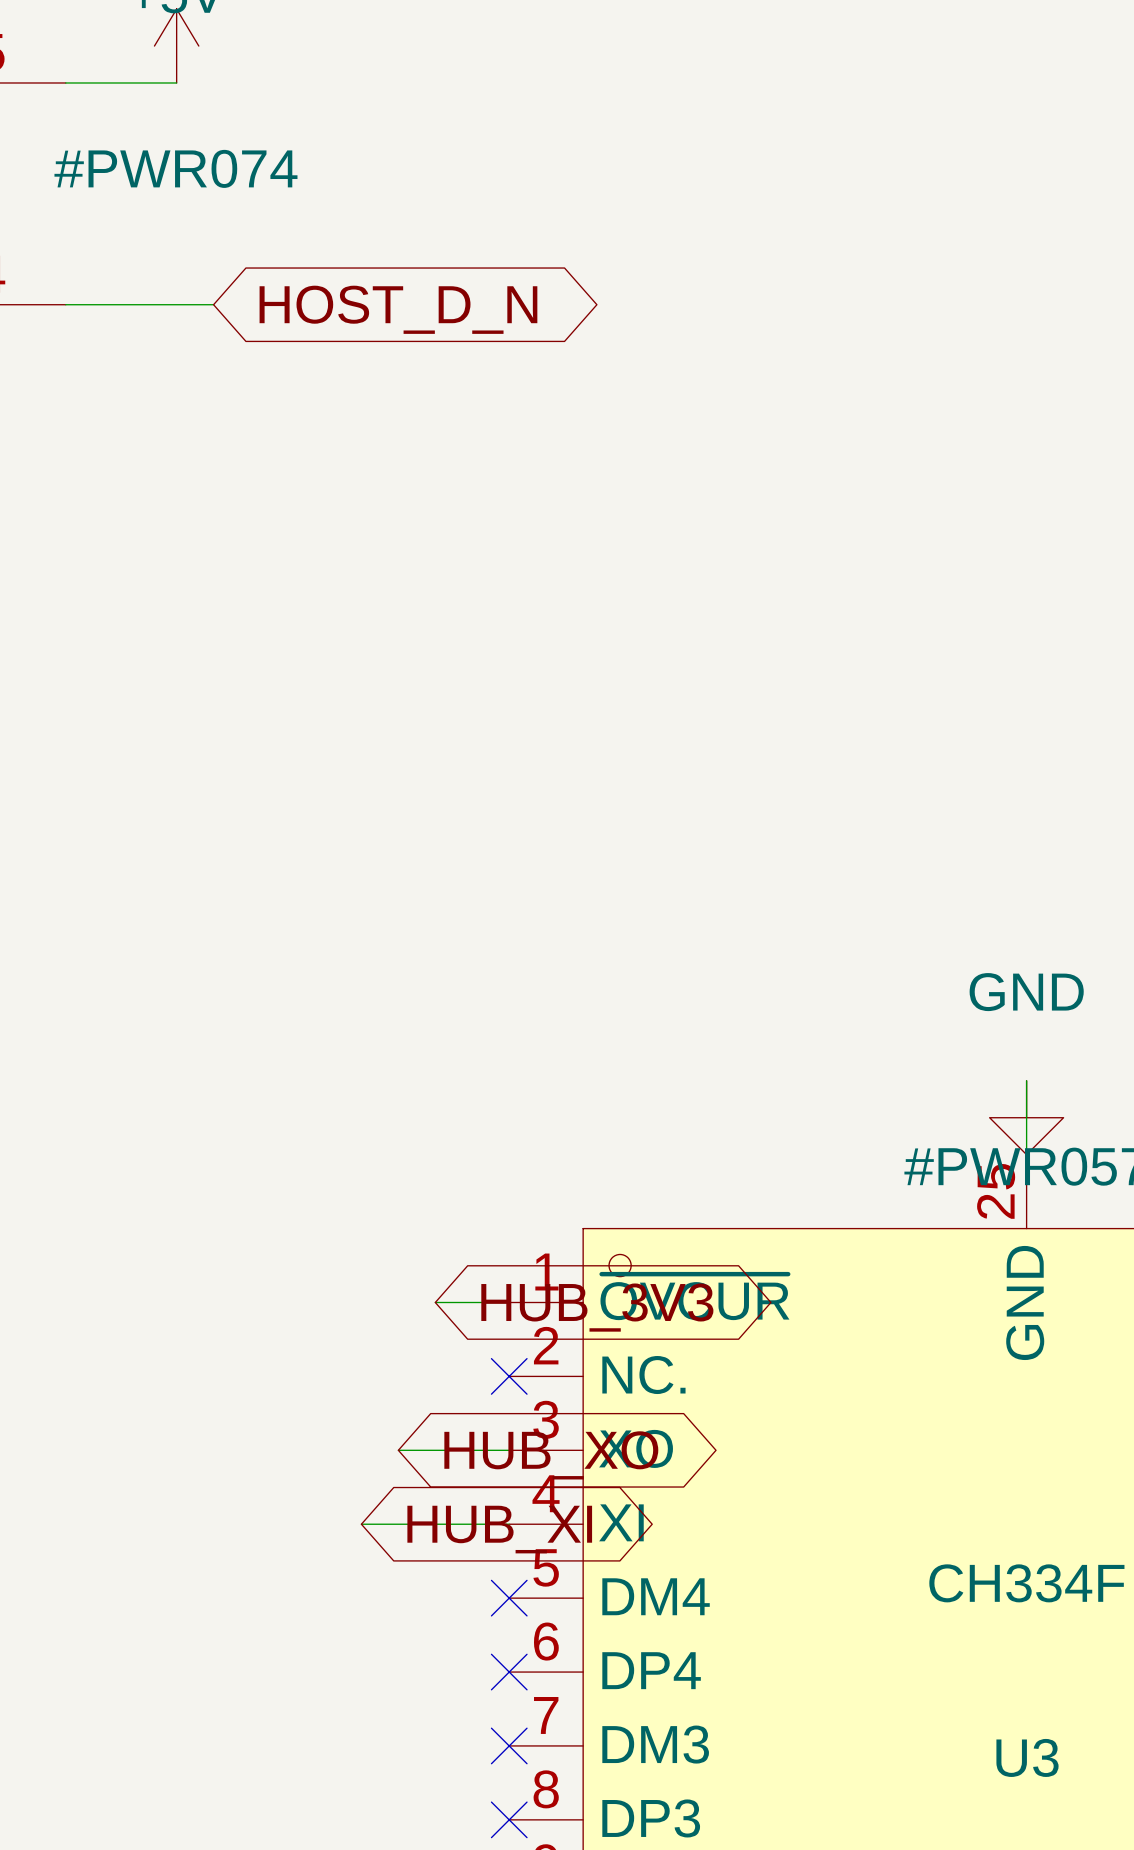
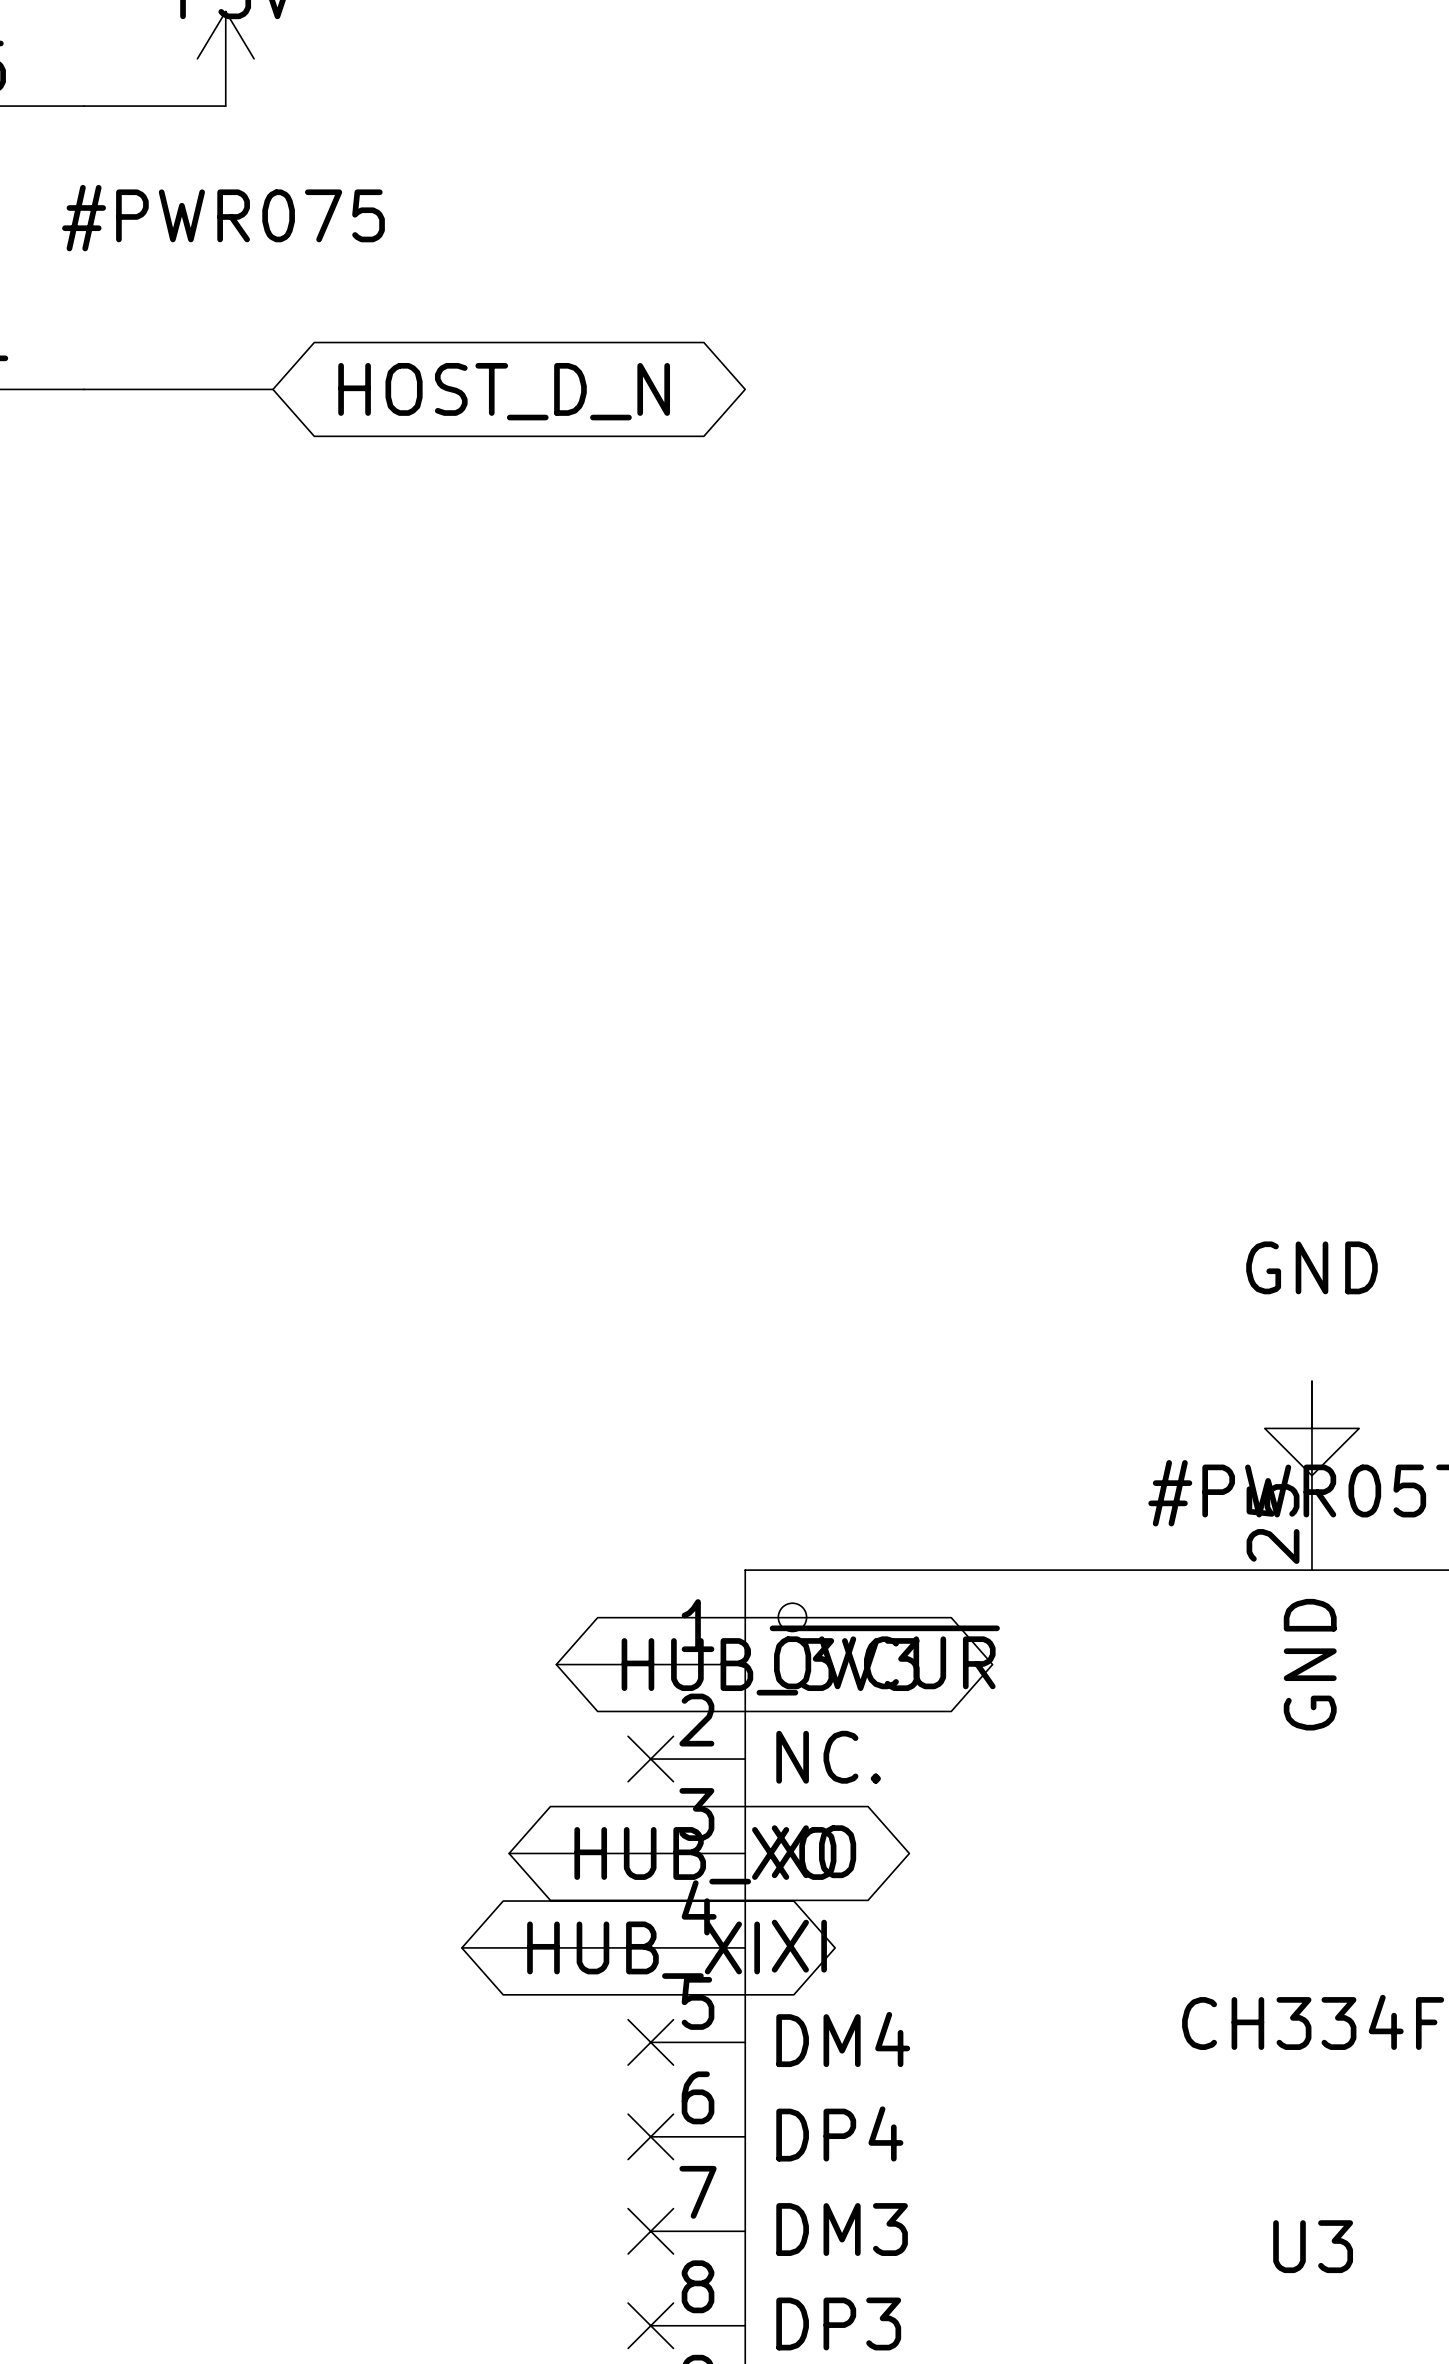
#PWR074 name: #PWR074 (175, 168) -> #PWR075 (223, 218)

